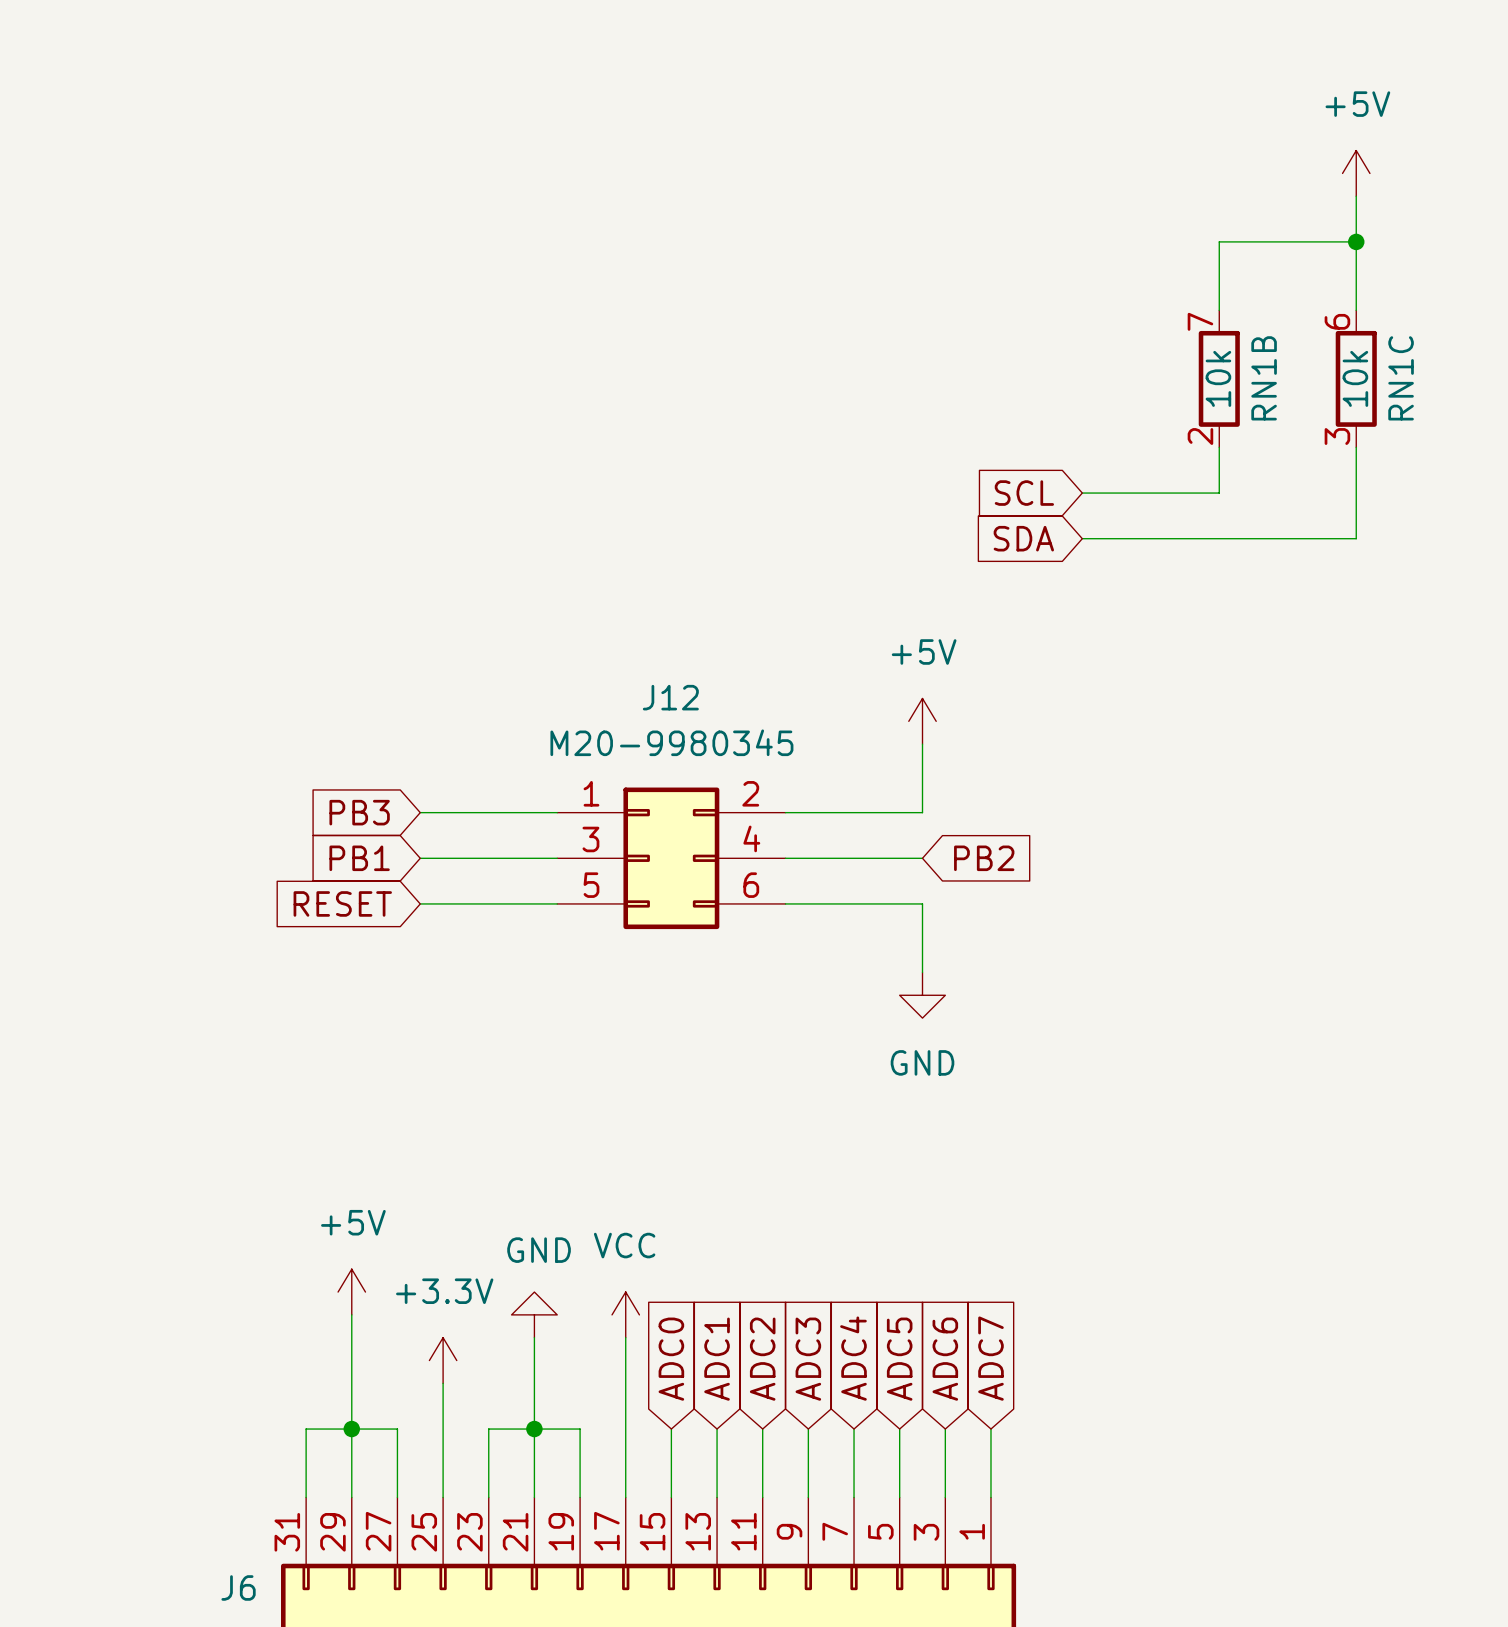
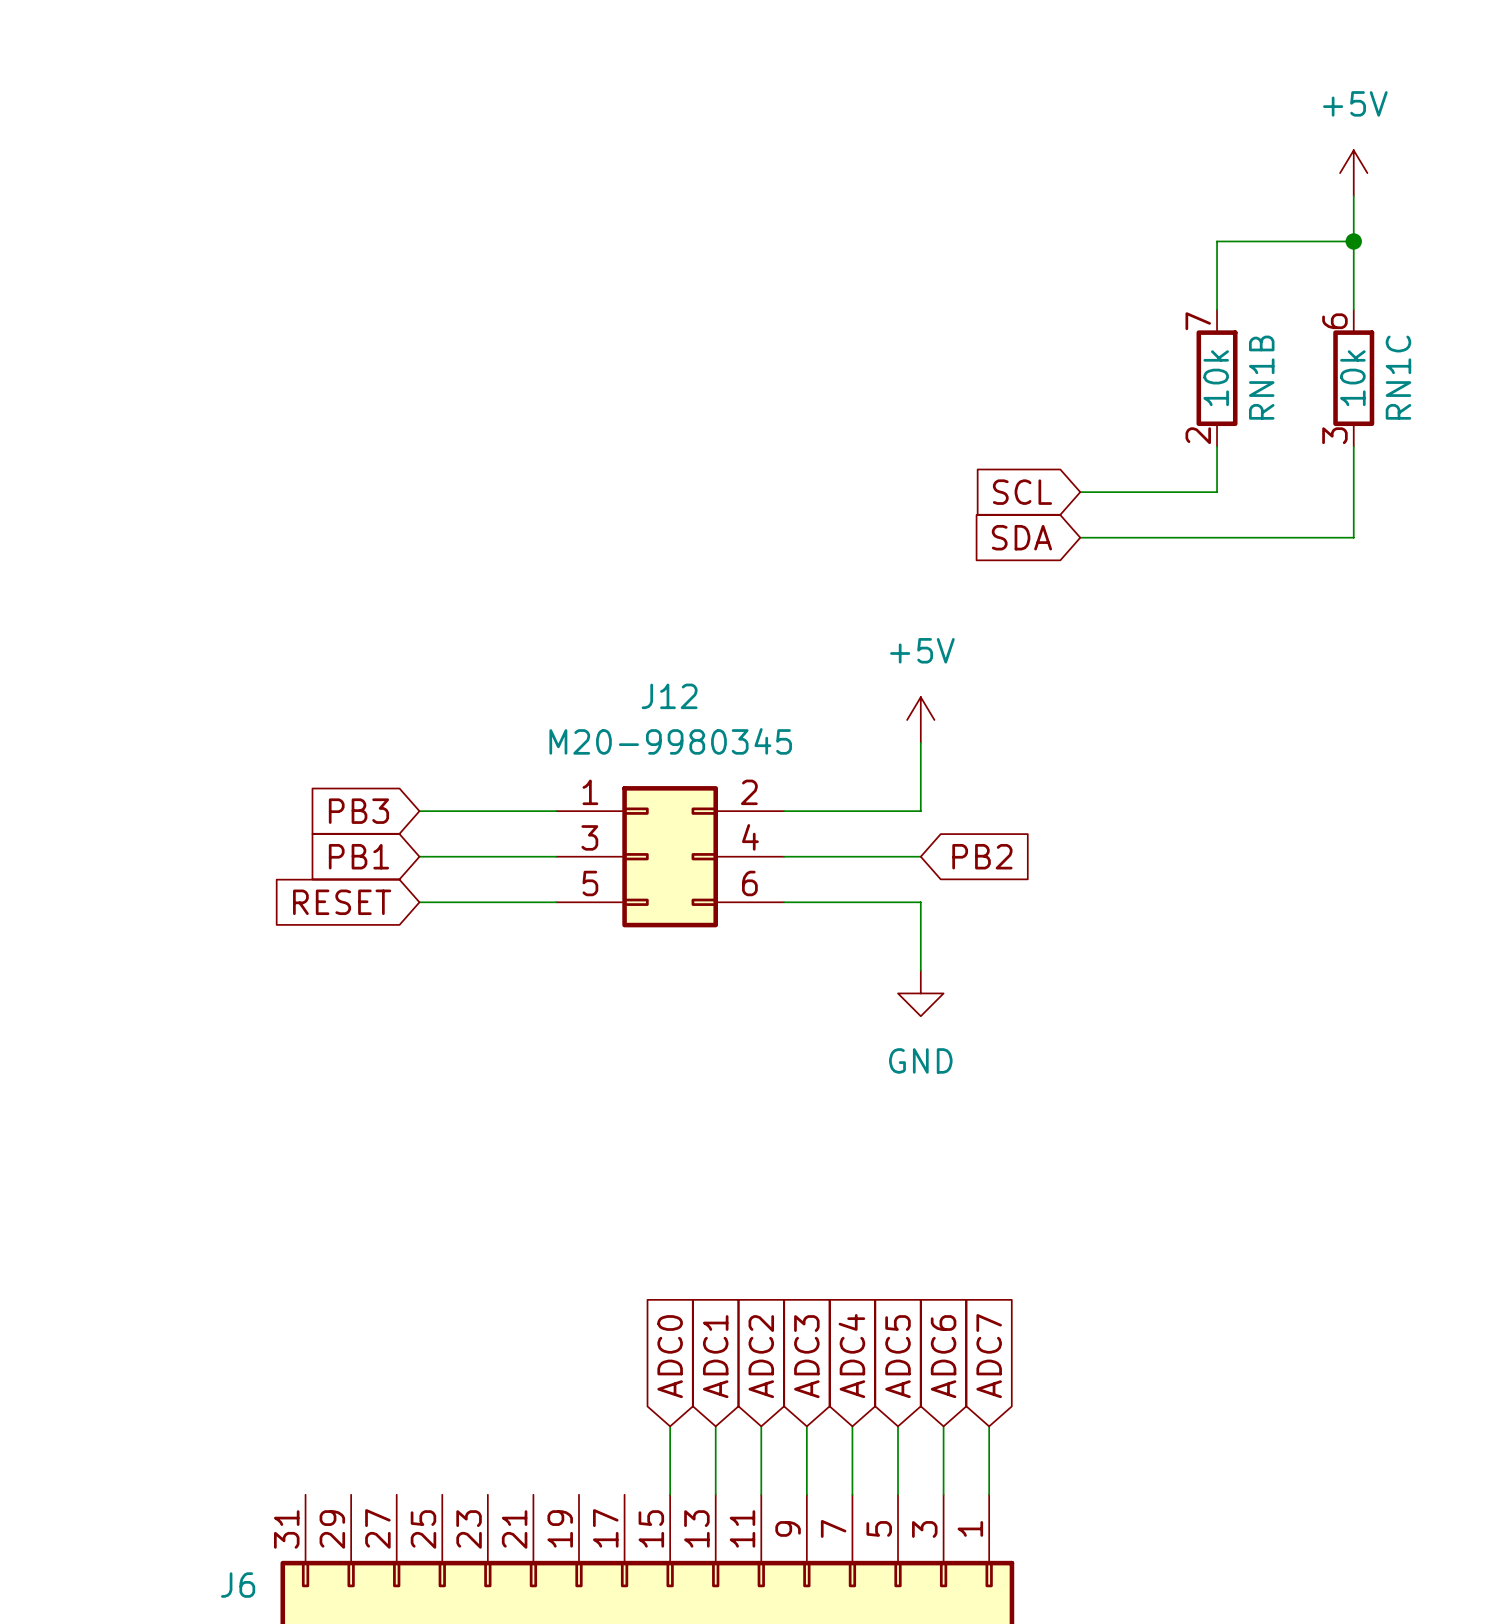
power symbol: +5V (351, 1292) -> none
wire: (351, 1314) (351, 1497) -> none
power symbol: GND (534, 1314) -> none
power symbol: VCC (625, 1314) -> none
wire: (534, 1337) (534, 1497) -> none
wire: (625, 1337) (625, 1497) -> none
power symbol: +3.3V (443, 1360) -> none
wire: (443, 1383) (443, 1497) -> none
junction: (351, 1429) -> none
junction: (534, 1429) -> none
wire: (306, 1497) (306, 1429) (397, 1429) (397, 1497) -> none
wire: (488, 1497) (488, 1429) (580, 1429) (580, 1497) -> none

